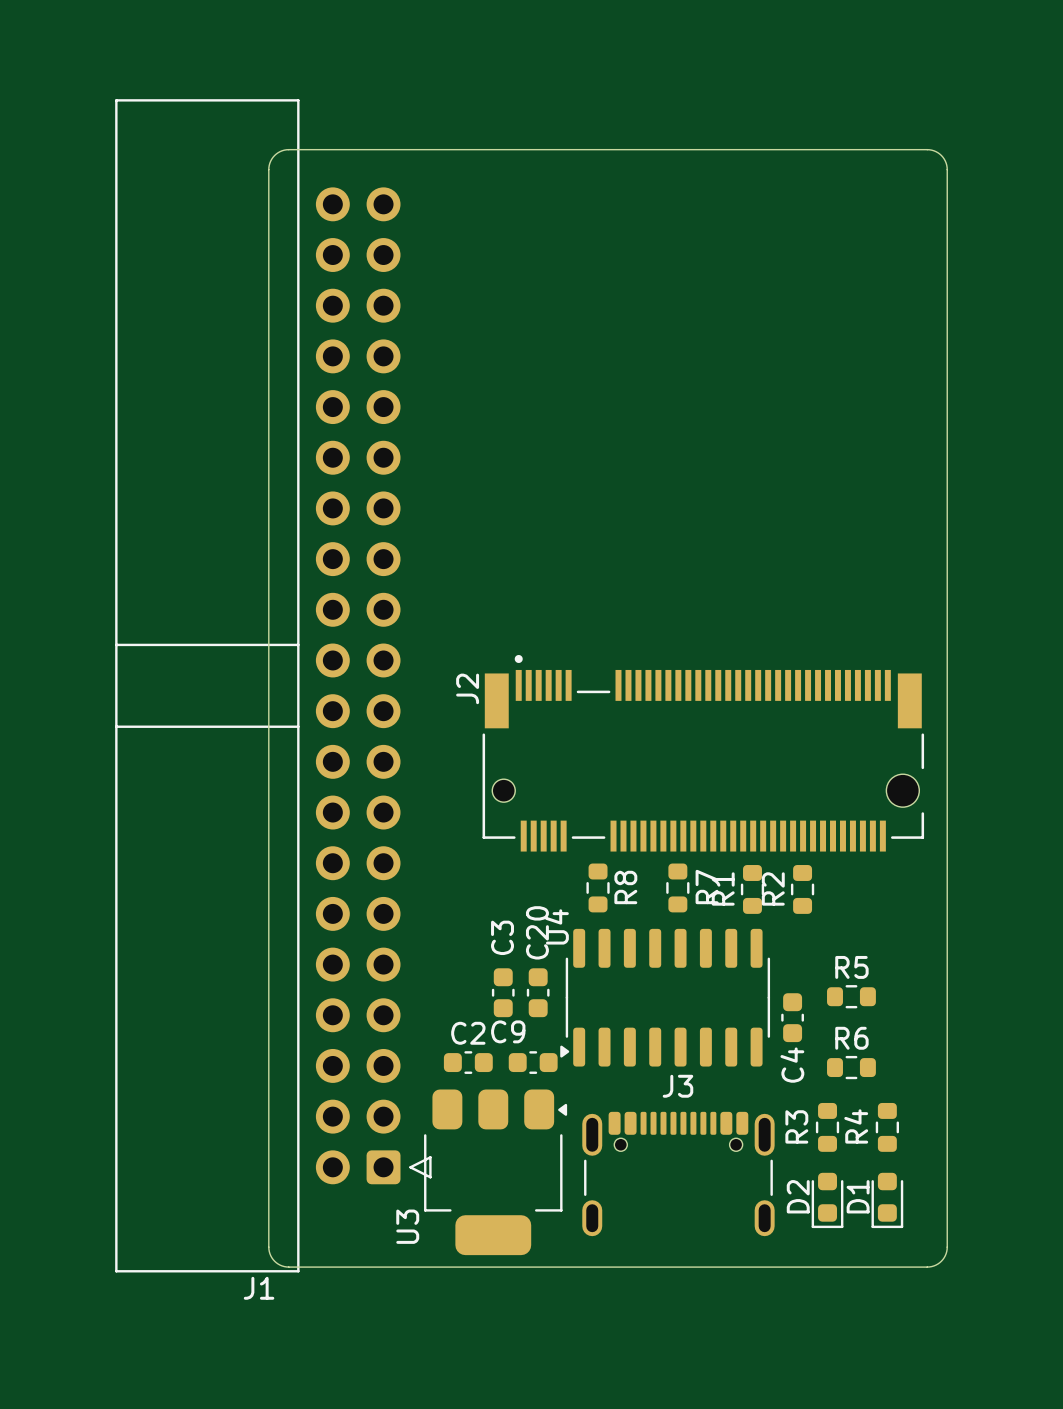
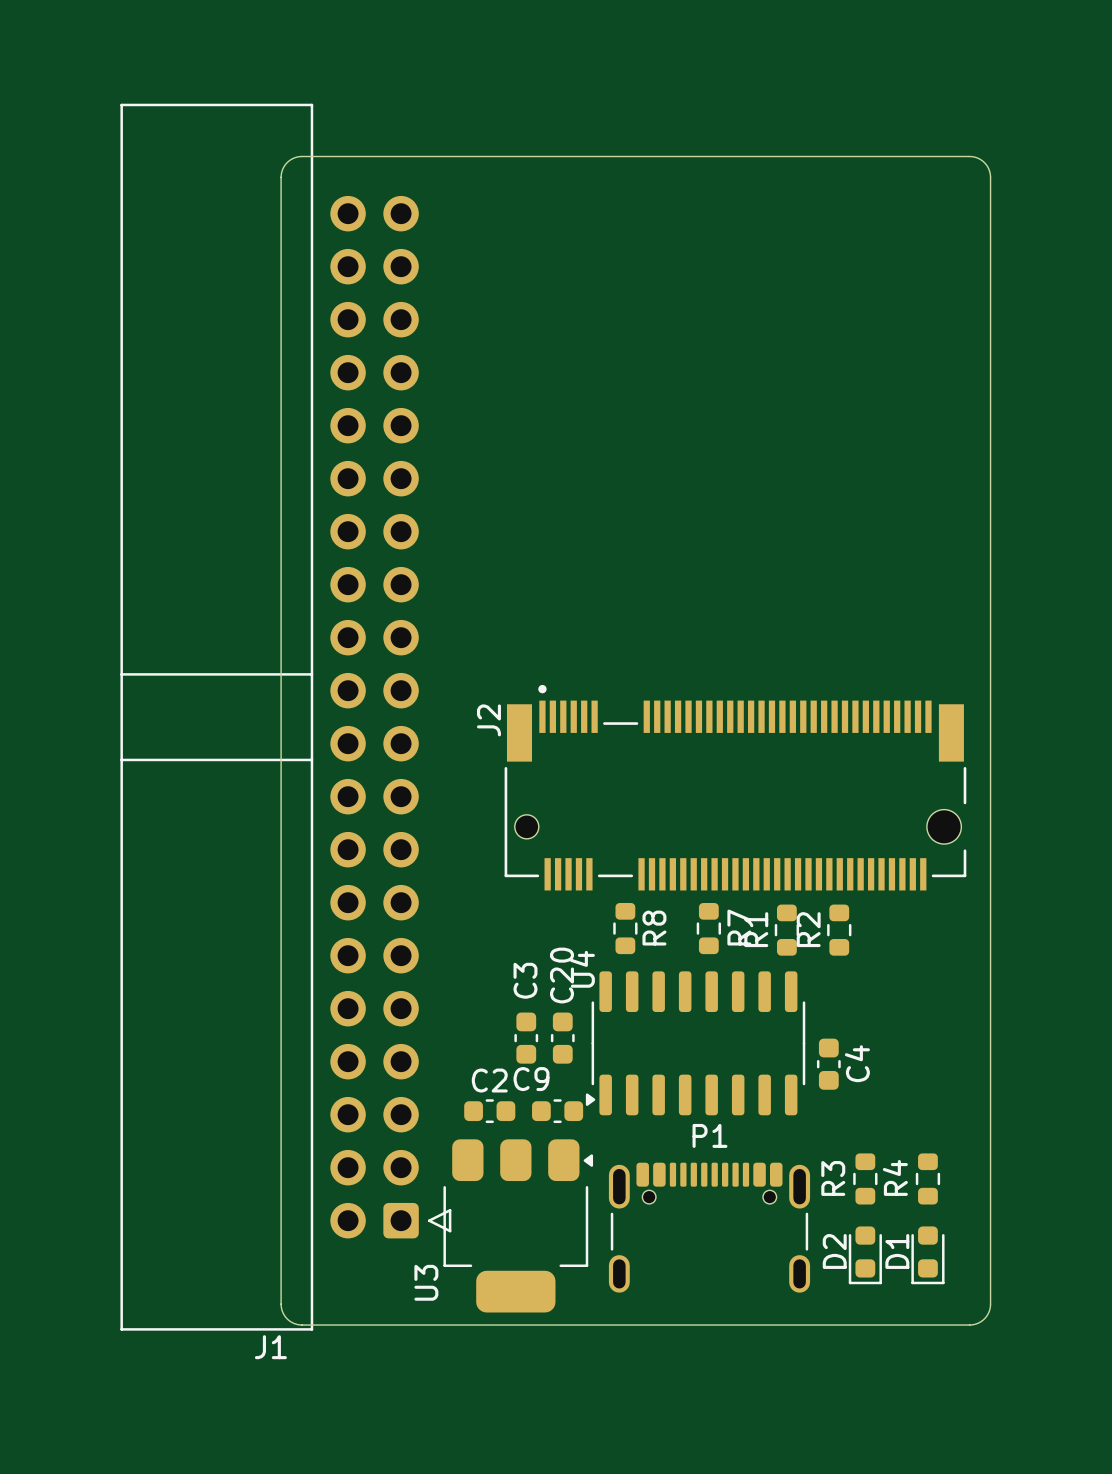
R5: (851, 996) -> none
C4 name position: C4 (792, 1065) -> C4 (857, 1063)
R6: (851, 1067) -> none
J3 name: J3 (677, 1086) -> P1 (709, 1135)

